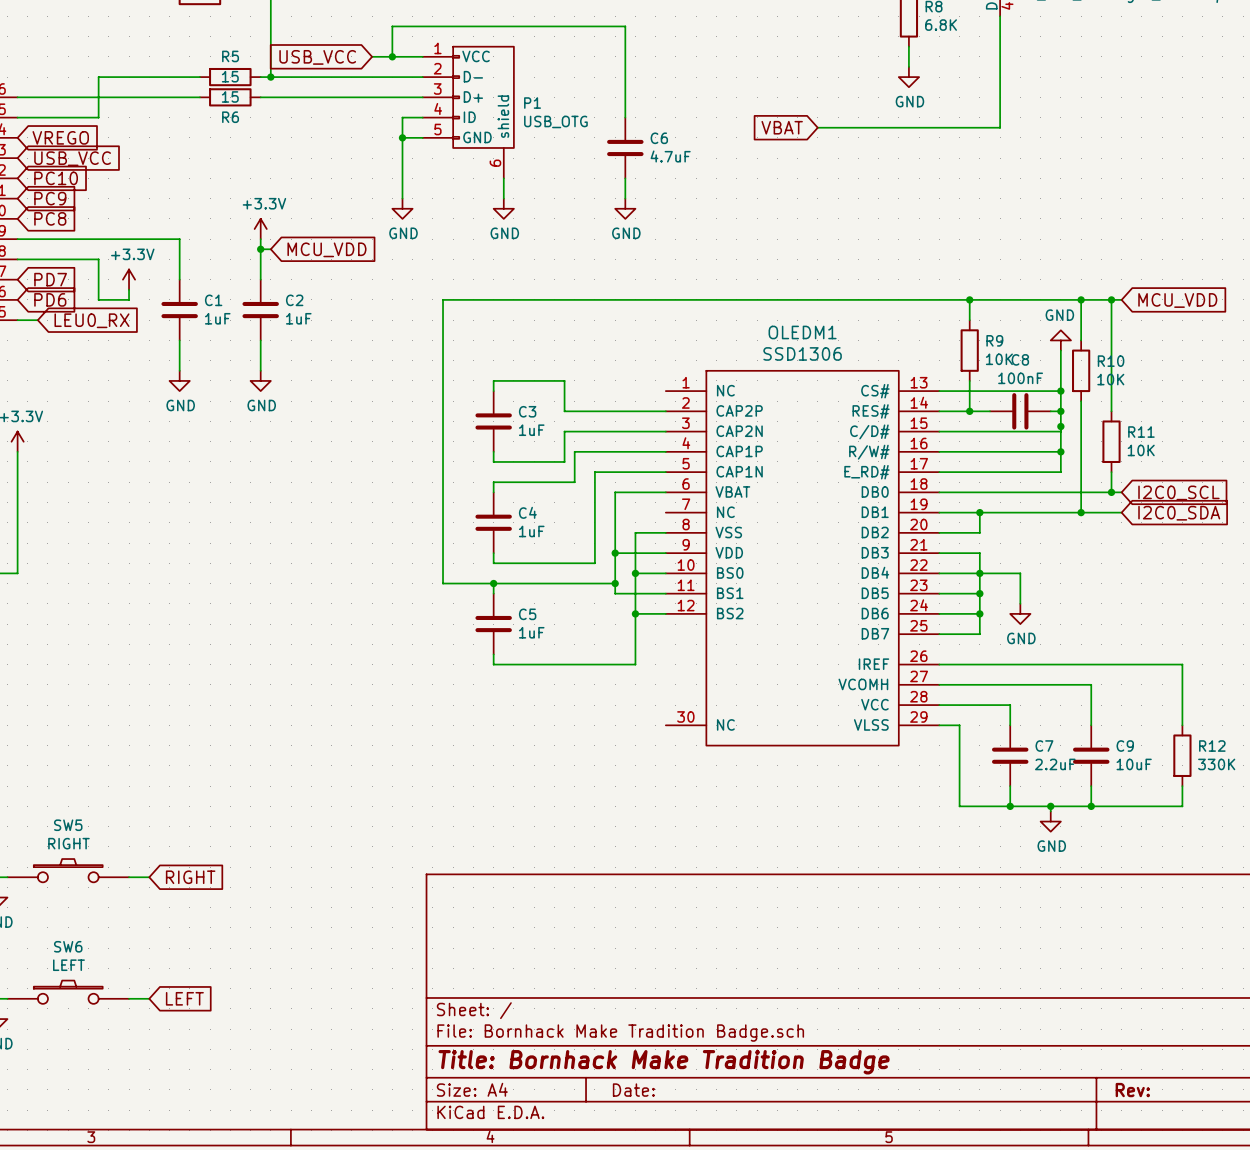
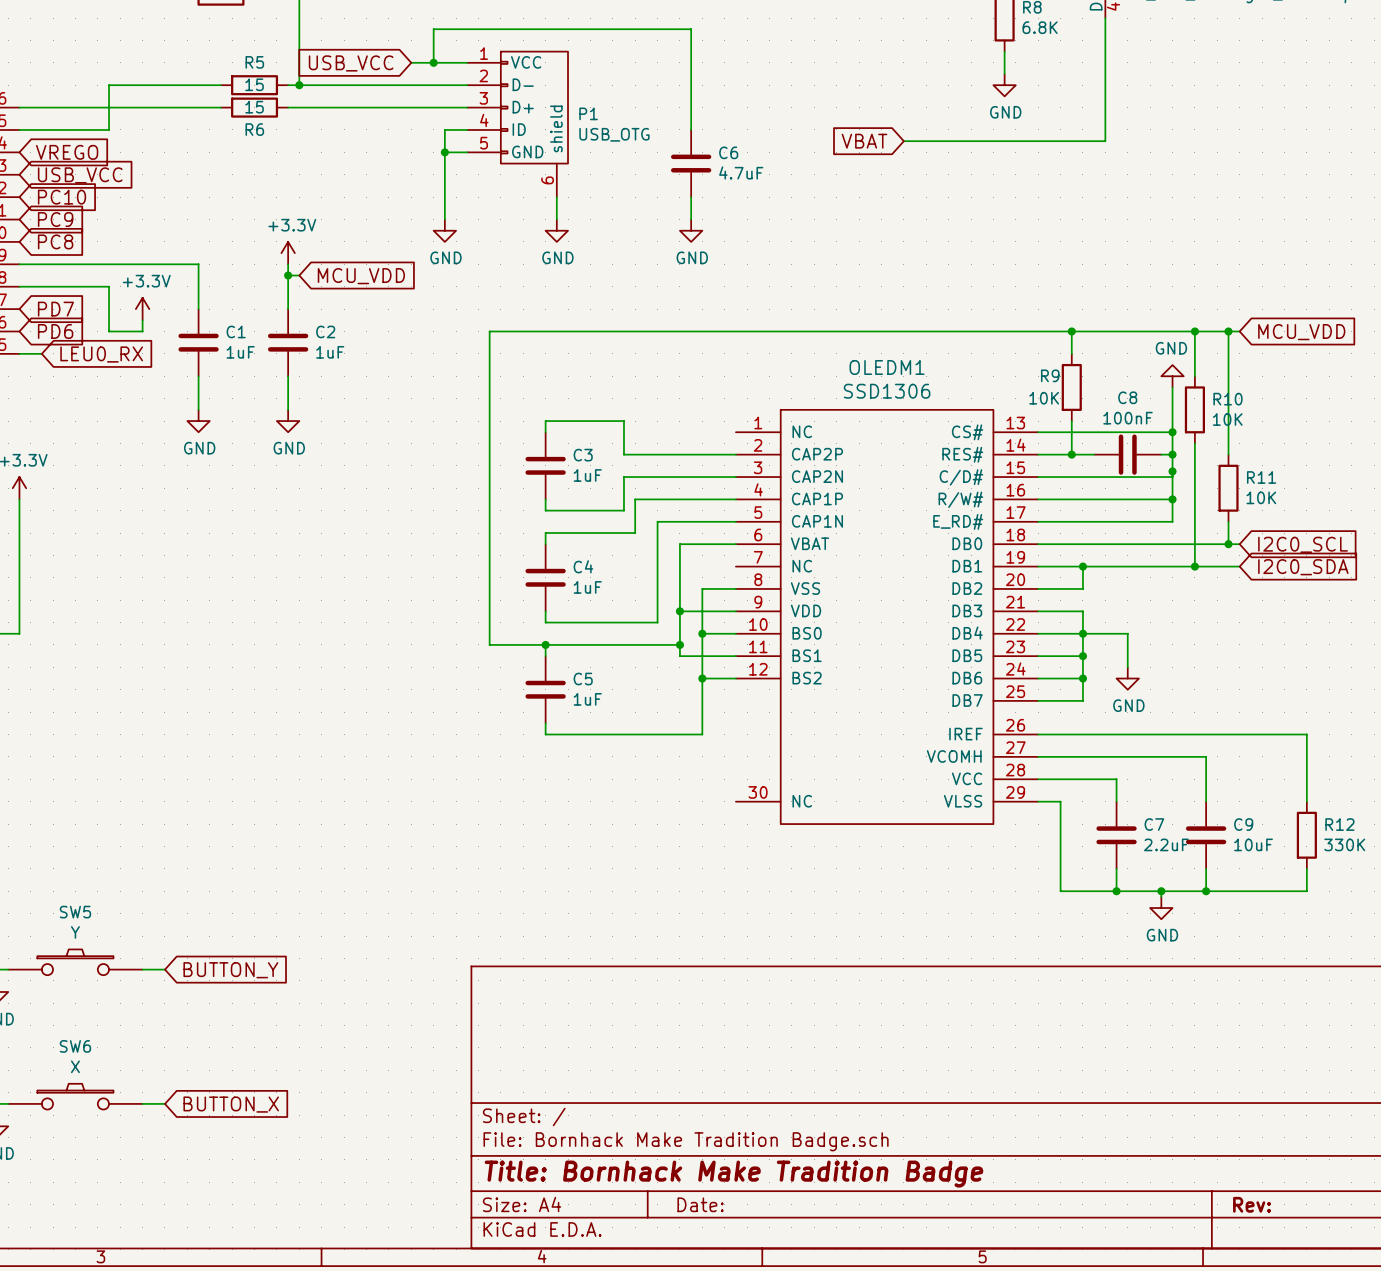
R9 name position: R9 (994, 340) -> R9 (1050, 375)
R9 value position: 10K (999, 359) -> 10K (1044, 398)
SW5 value: RIGHT (68, 843) -> Y (75, 932)
global label: RIGHT (190, 877) -> BUTTON_Y (230, 970)
SW6 value: LEFT (68, 965) -> X (75, 1066)
global label: LEFT (184, 998) -> BUTTON_X (231, 1104)

